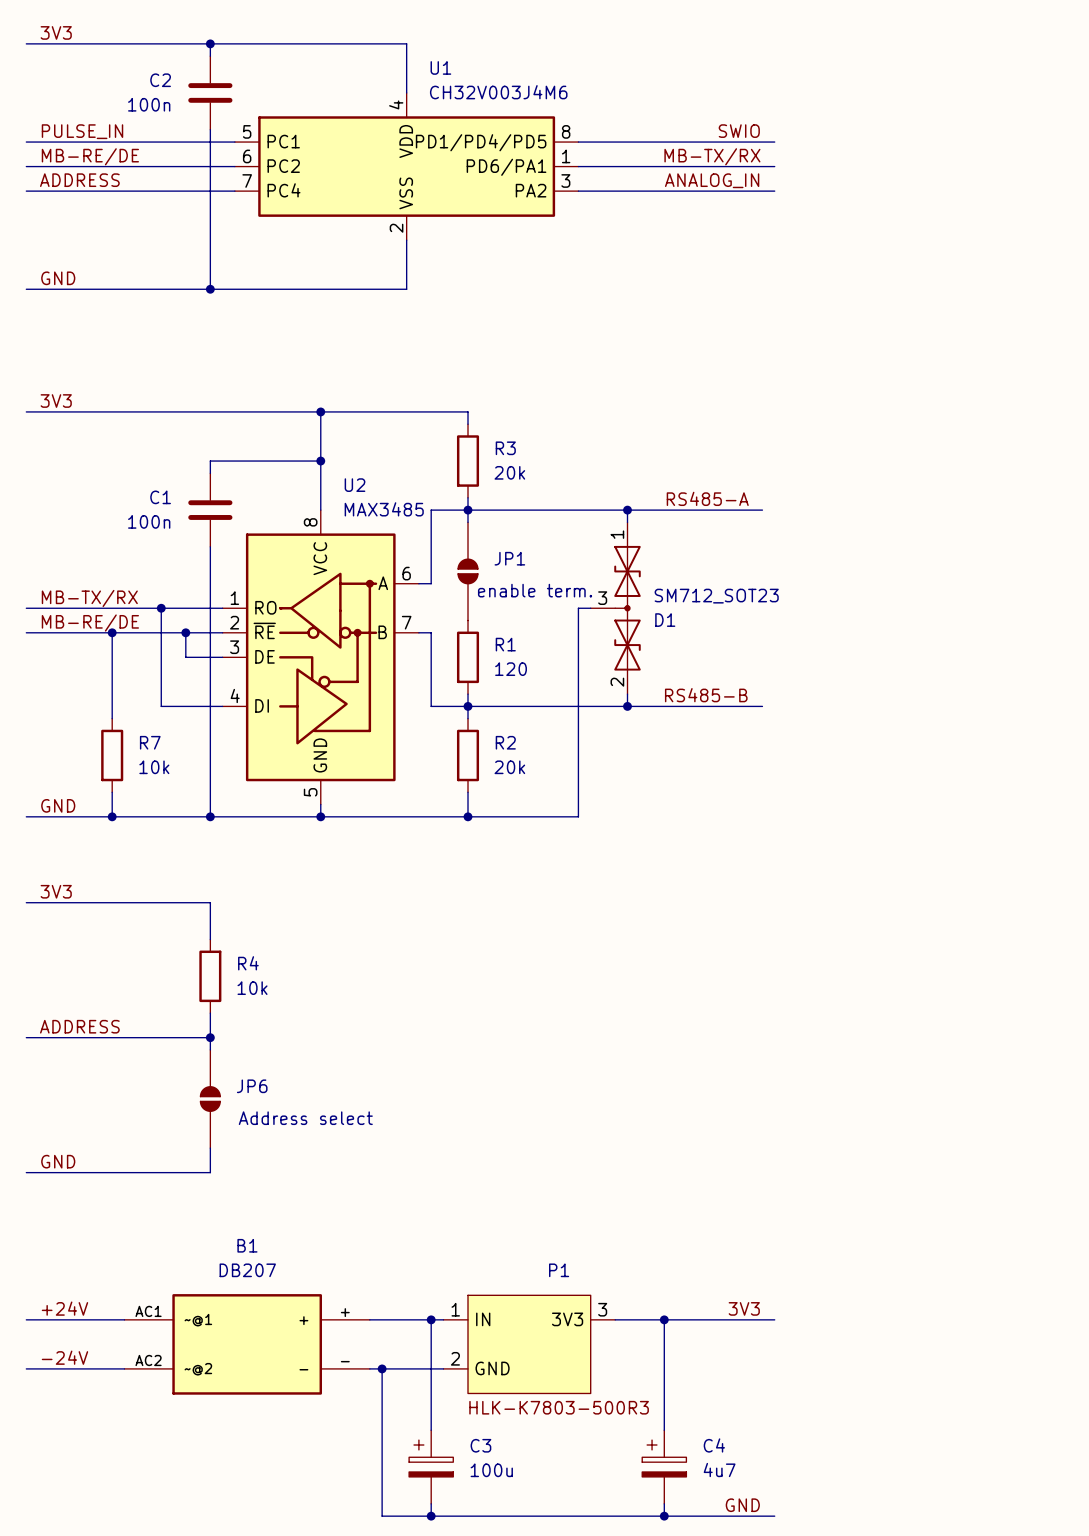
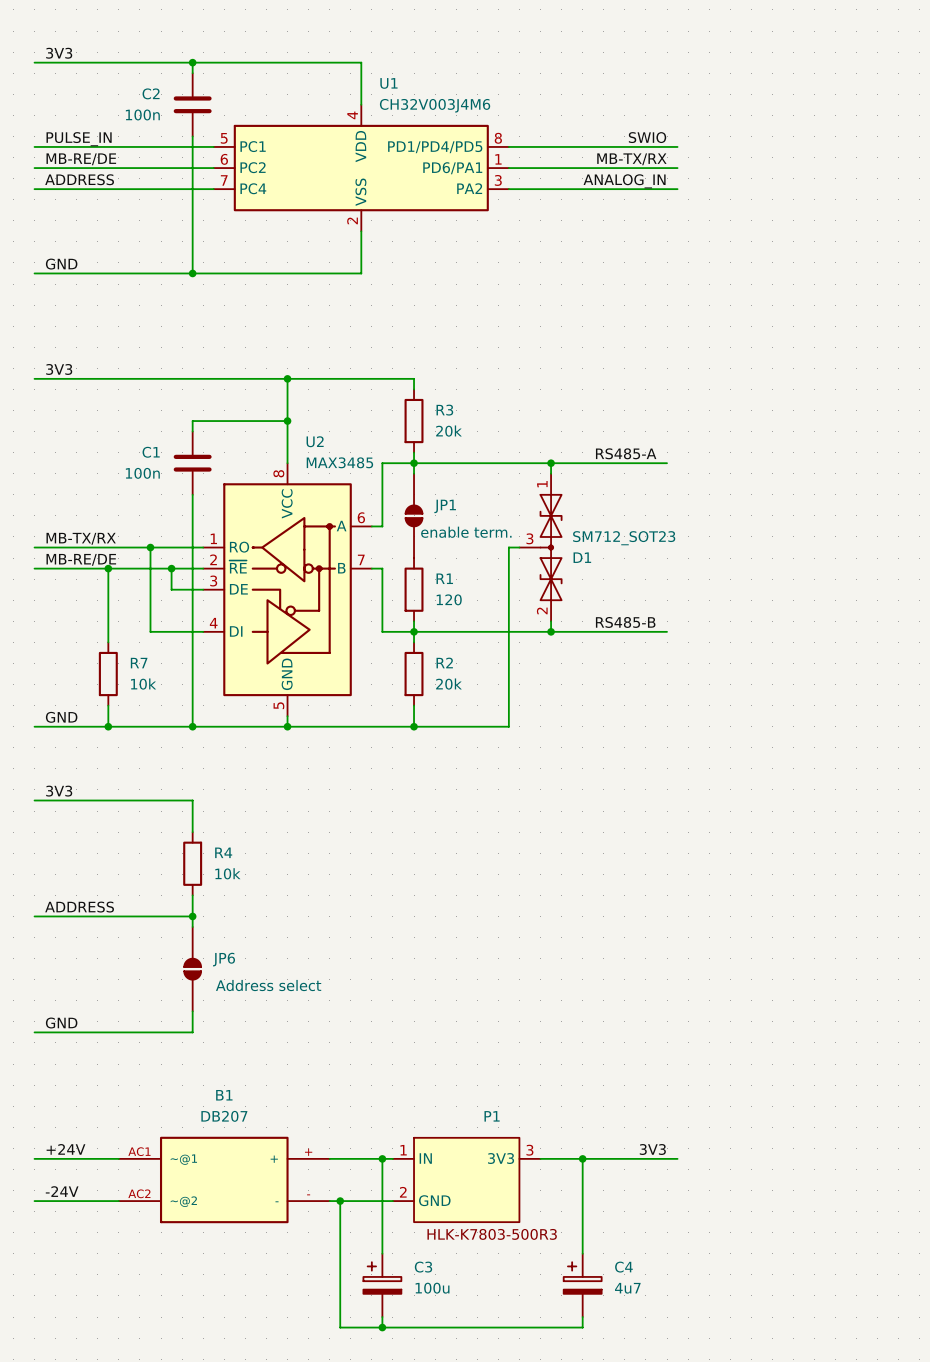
label: GND (742, 1505) -> none
wire: (664, 1516) (774, 1516) -> none
junction: (664, 1516) -> none

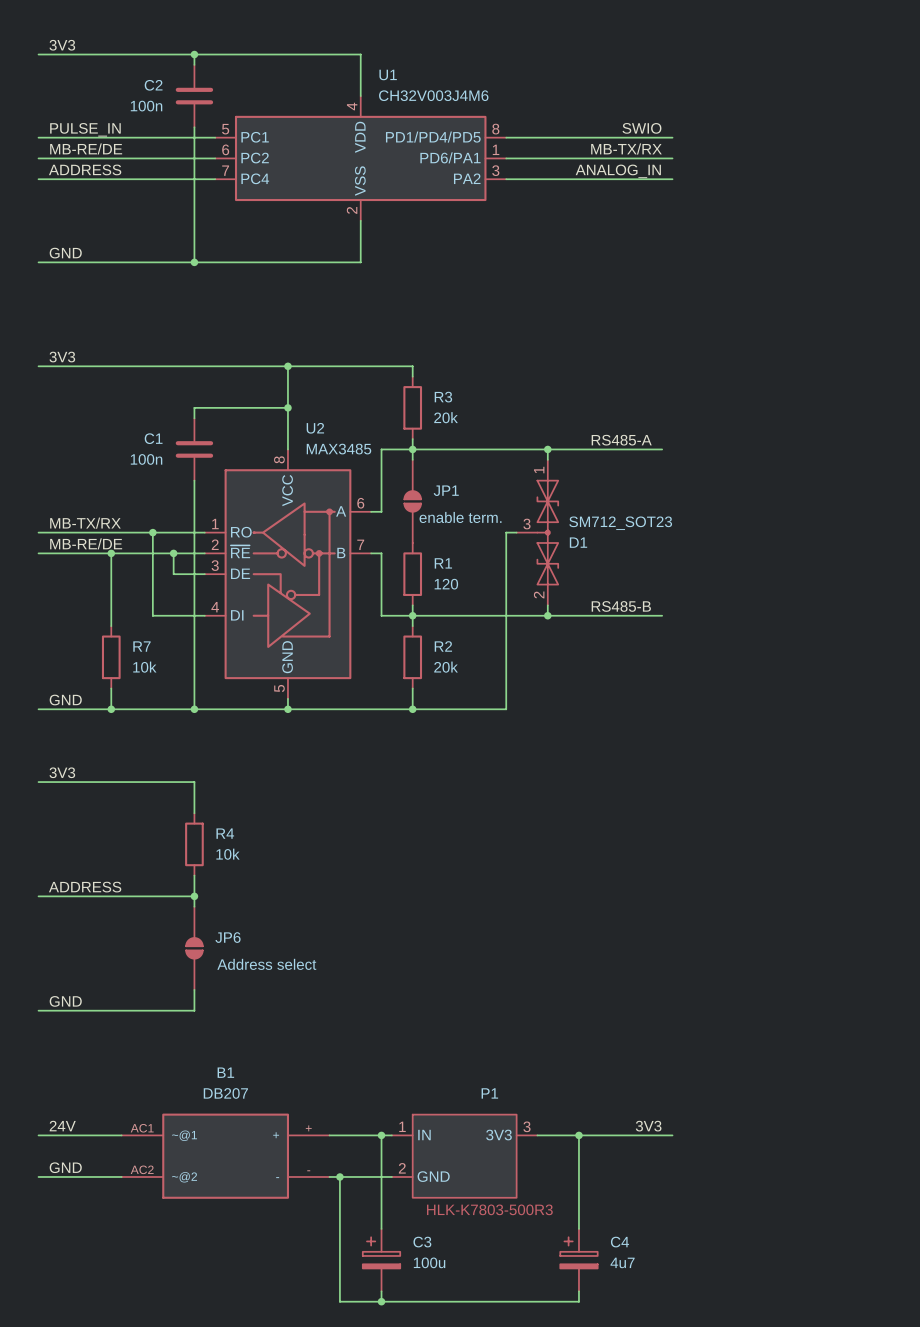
label: +24V (65, 1149) -> 24V (62, 1126)
label: -24V (62, 1191) -> GND (65, 1167)

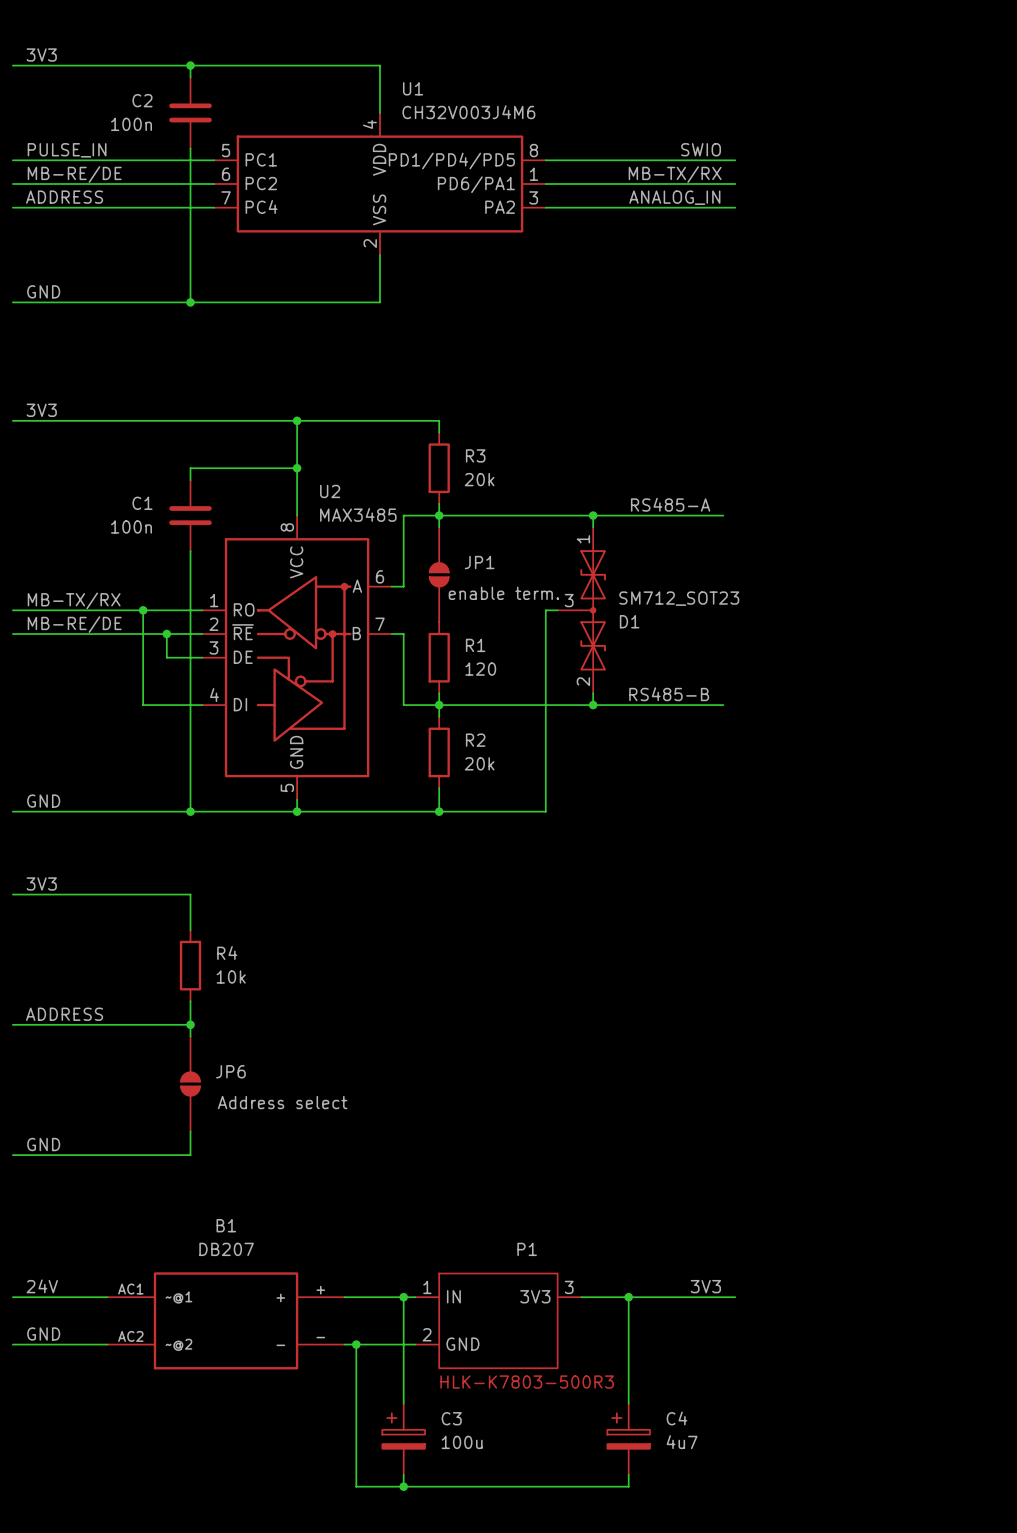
wire: (111, 553) (111, 626) -> none
junction: (111, 553) -> none
R7: 10k (111, 657) -> none
wire: (111, 688) (111, 709) -> none
junction: (111, 709) -> none

